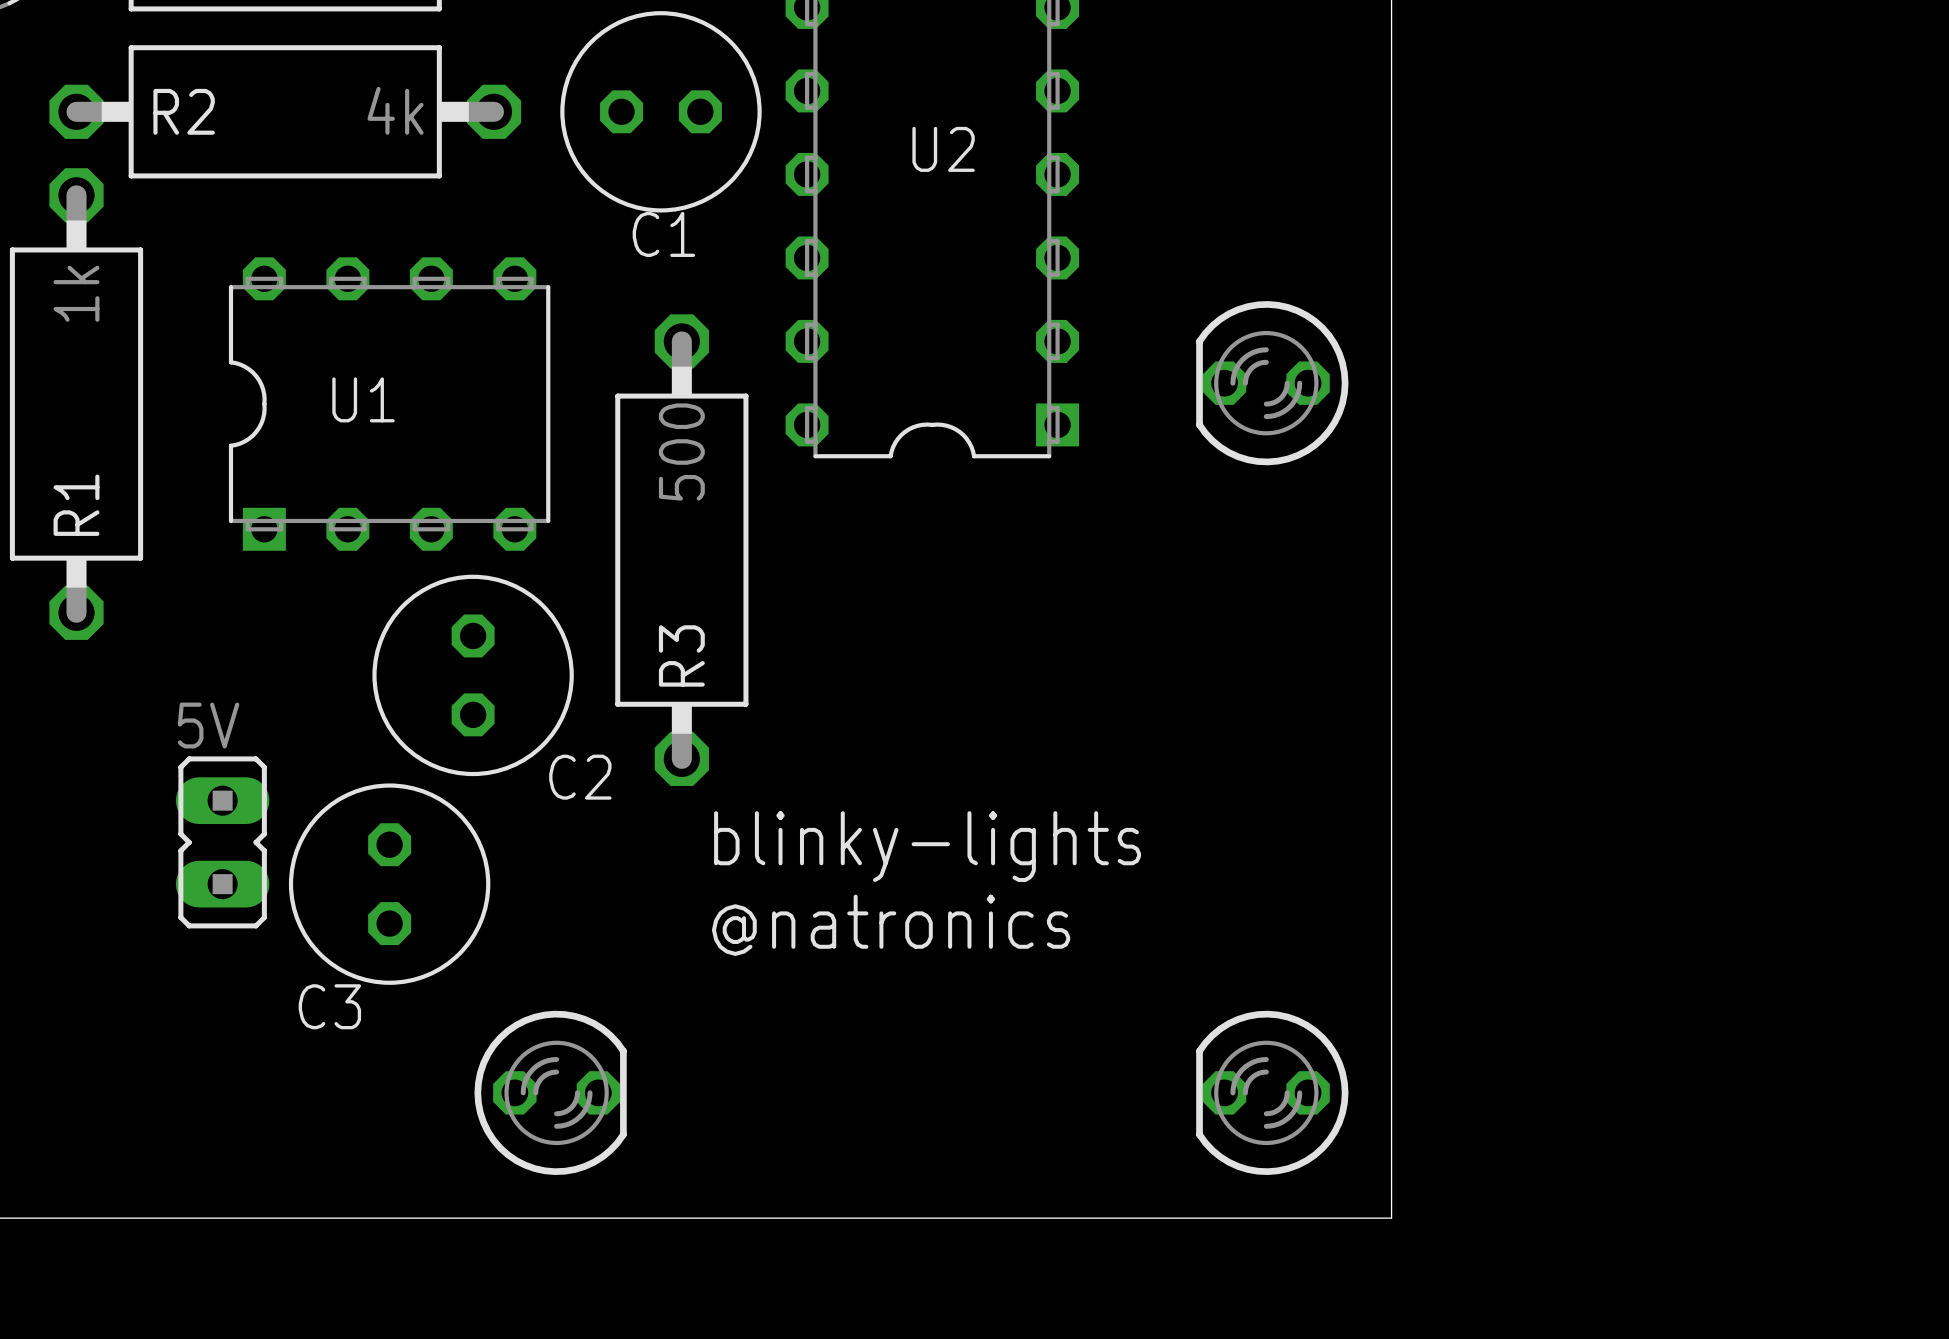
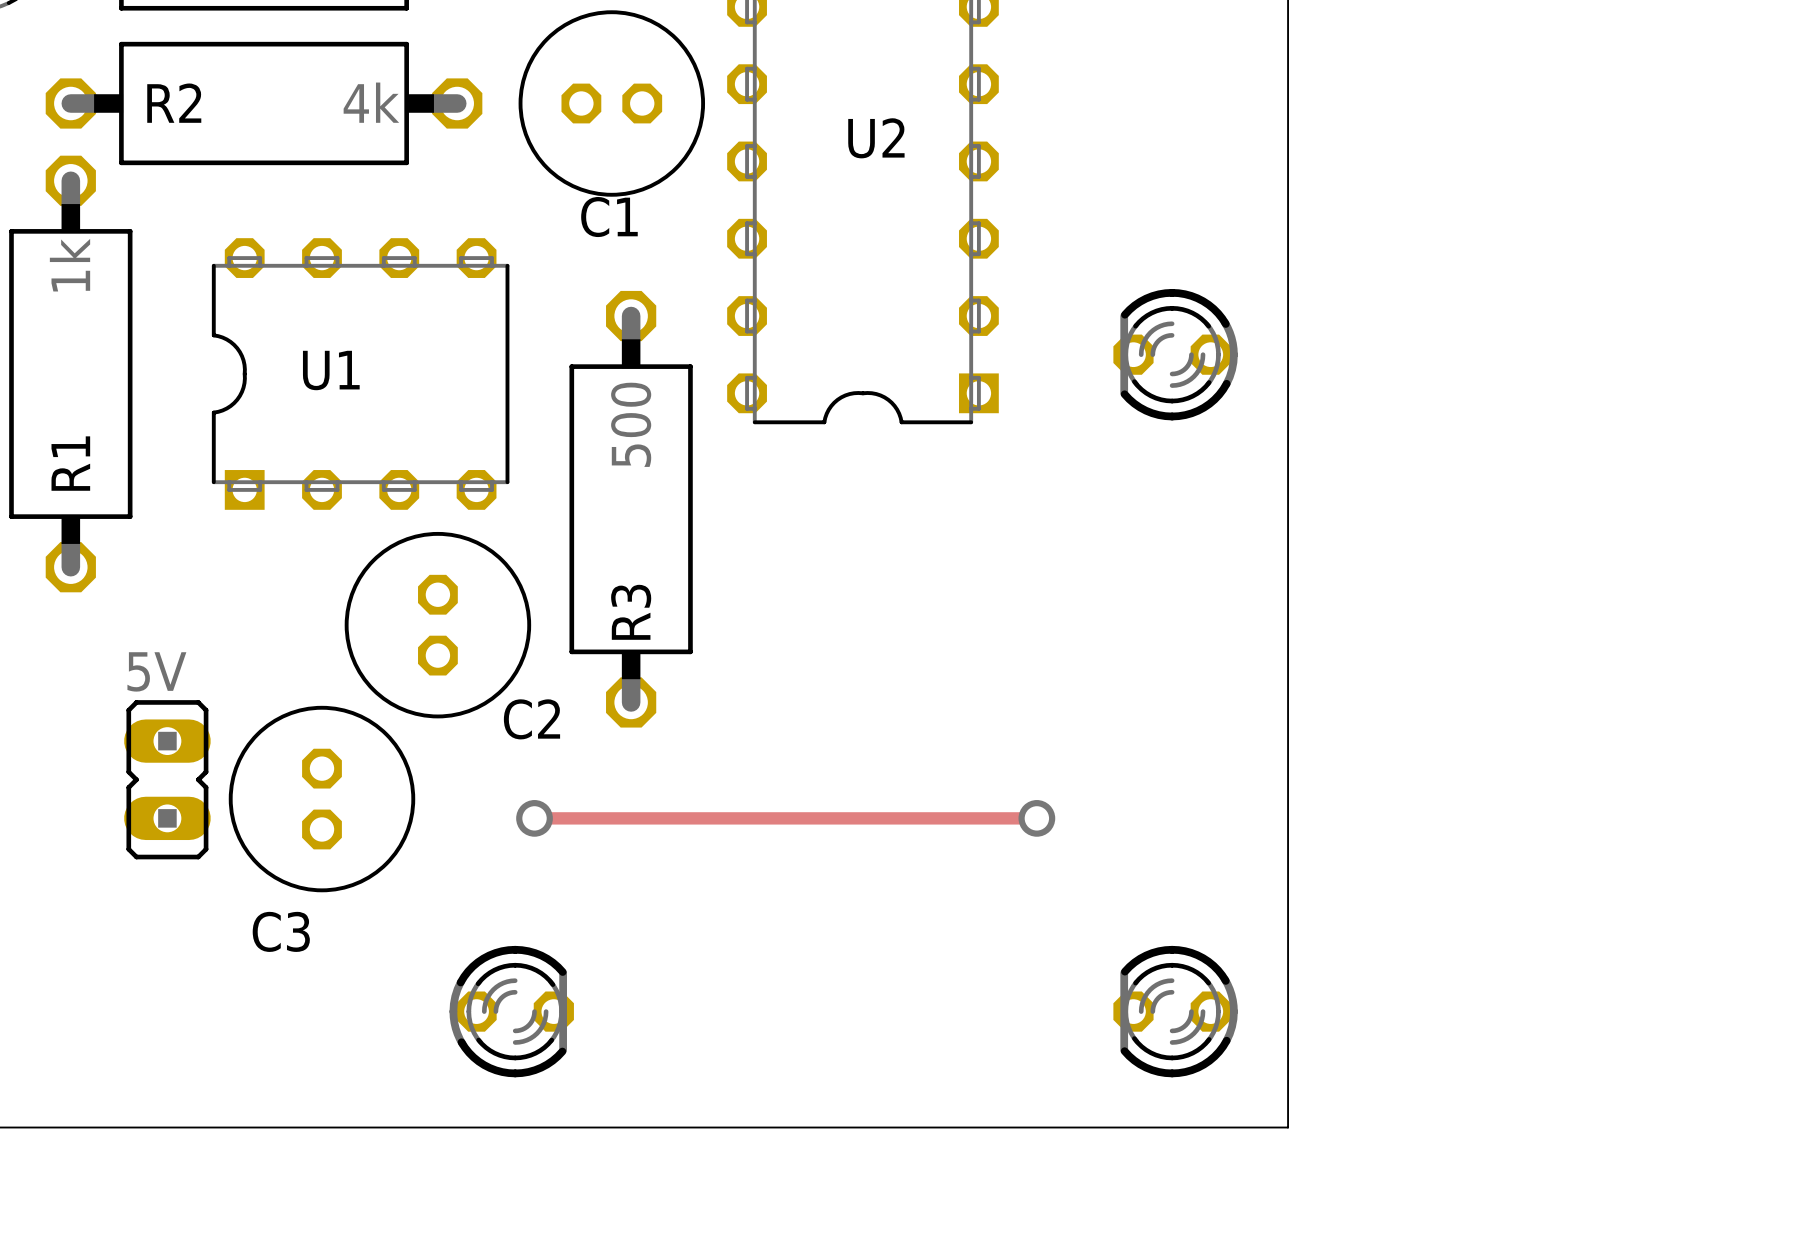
C1 footprint: [560, 11, 762, 213] -> [518, 10, 706, 197]
part footprint: [1196, 301, 1349, 466] -> [1113, 288, 1238, 421]
C2 footprint: [372, 574, 574, 777] -> [344, 531, 532, 719]
C3 footprint: [288, 783, 491, 985] -> [228, 705, 416, 893]
part position: (222, 842) -> (167, 779)
text: blinky-lights (927, 846) -> none
track: none -> (534, 818) (1036, 818)
via: none -> (534, 818)
via: none -> (1036, 818)
text: @natronics (891, 925) -> none
part footprint: [474, 1010, 627, 1176] -> [449, 945, 574, 1078]
part footprint: [1196, 1010, 1349, 1176] -> [1113, 945, 1238, 1078]

